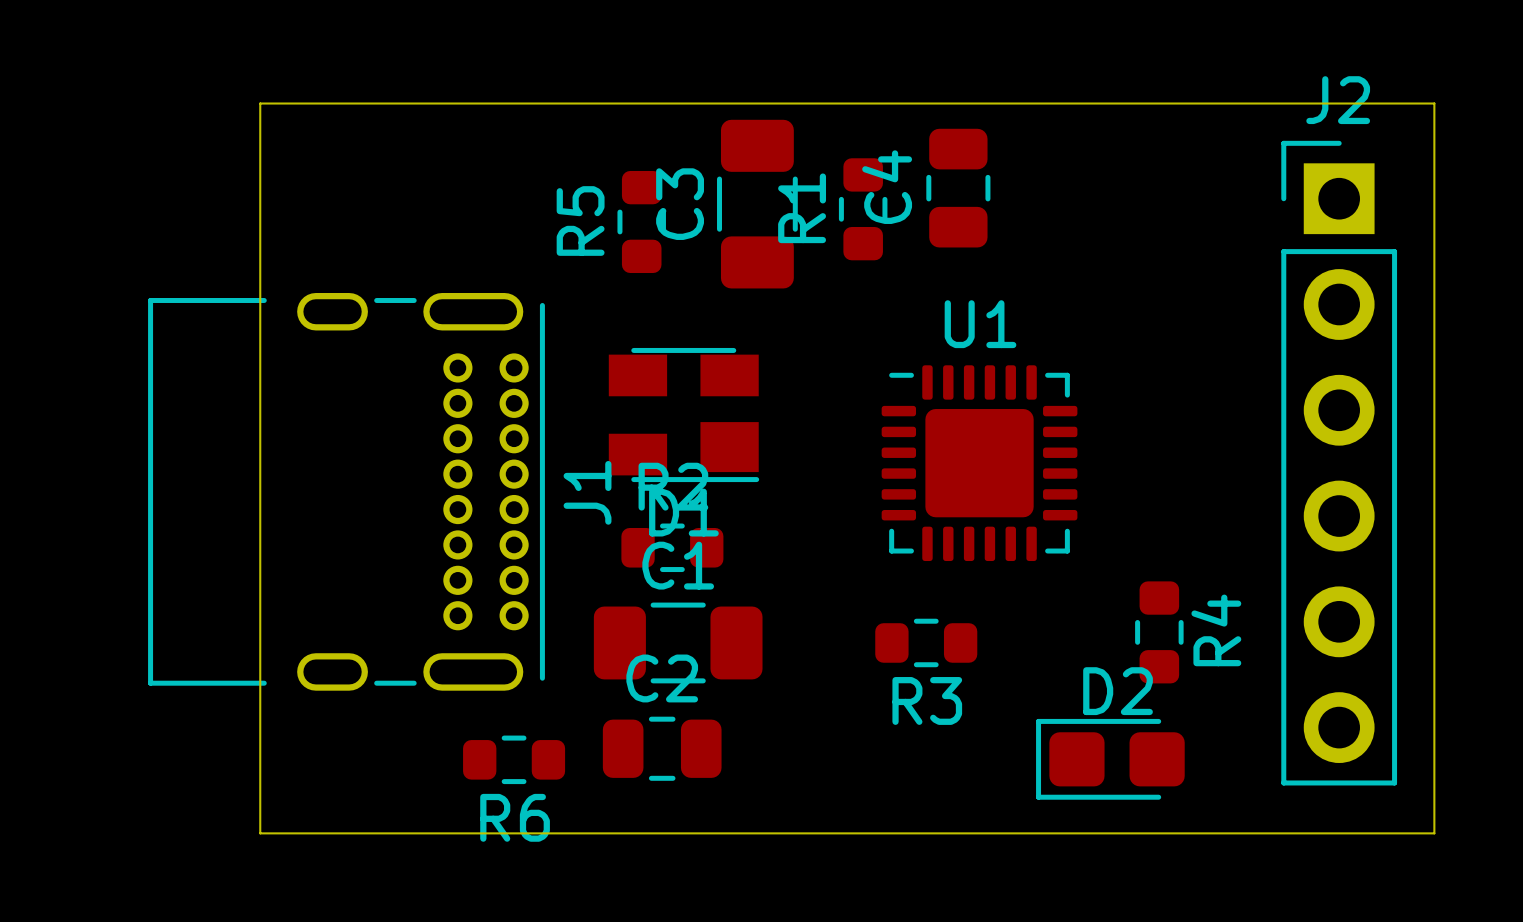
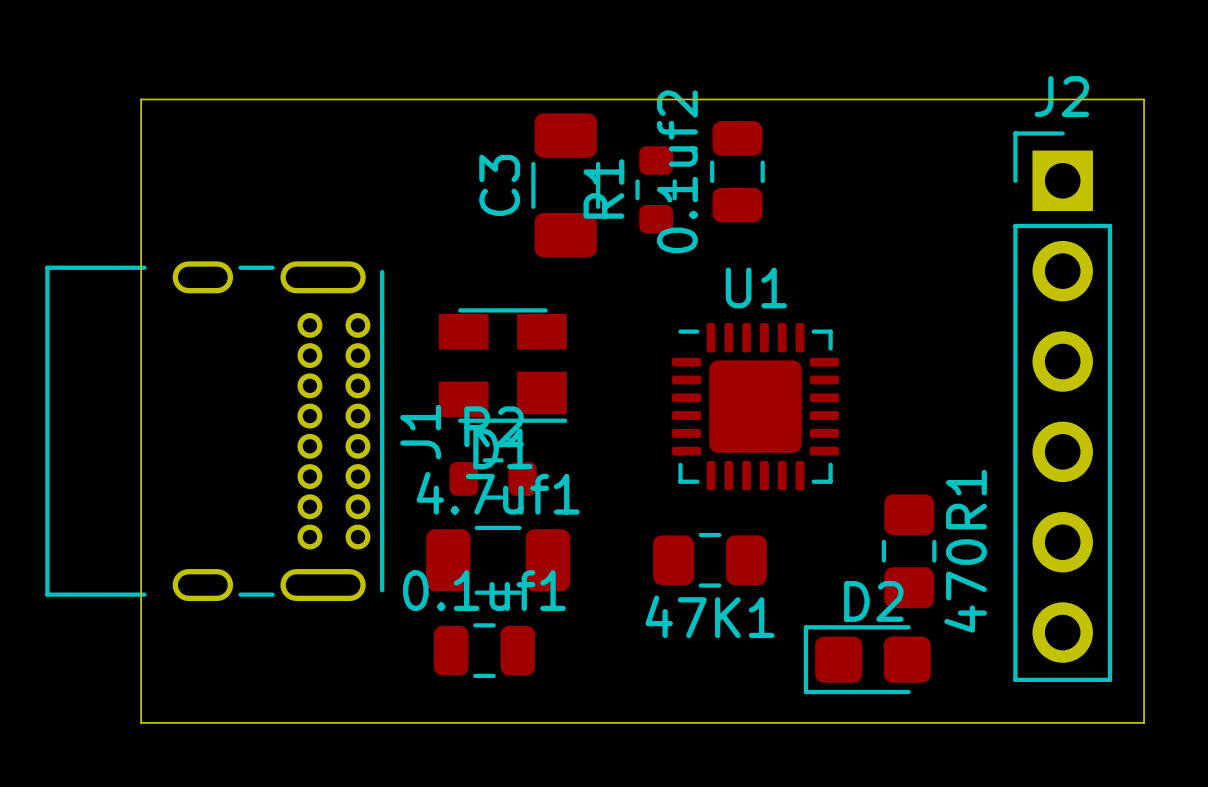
C4 name: C4 (887, 187) -> 0.1uf2 (677, 171)
R5: (641, 221) -> none
C1 name: C1 (678, 565) -> 4.7uf1 (498, 493)
R4: (1159, 632) -> none
470R1: none -> (909, 551)
R3: (926, 642) -> none
47K1: none -> (710, 560)
C2 name: C2 (662, 678) -> 0.1uf1 (484, 590)
R6: (514, 759) -> none

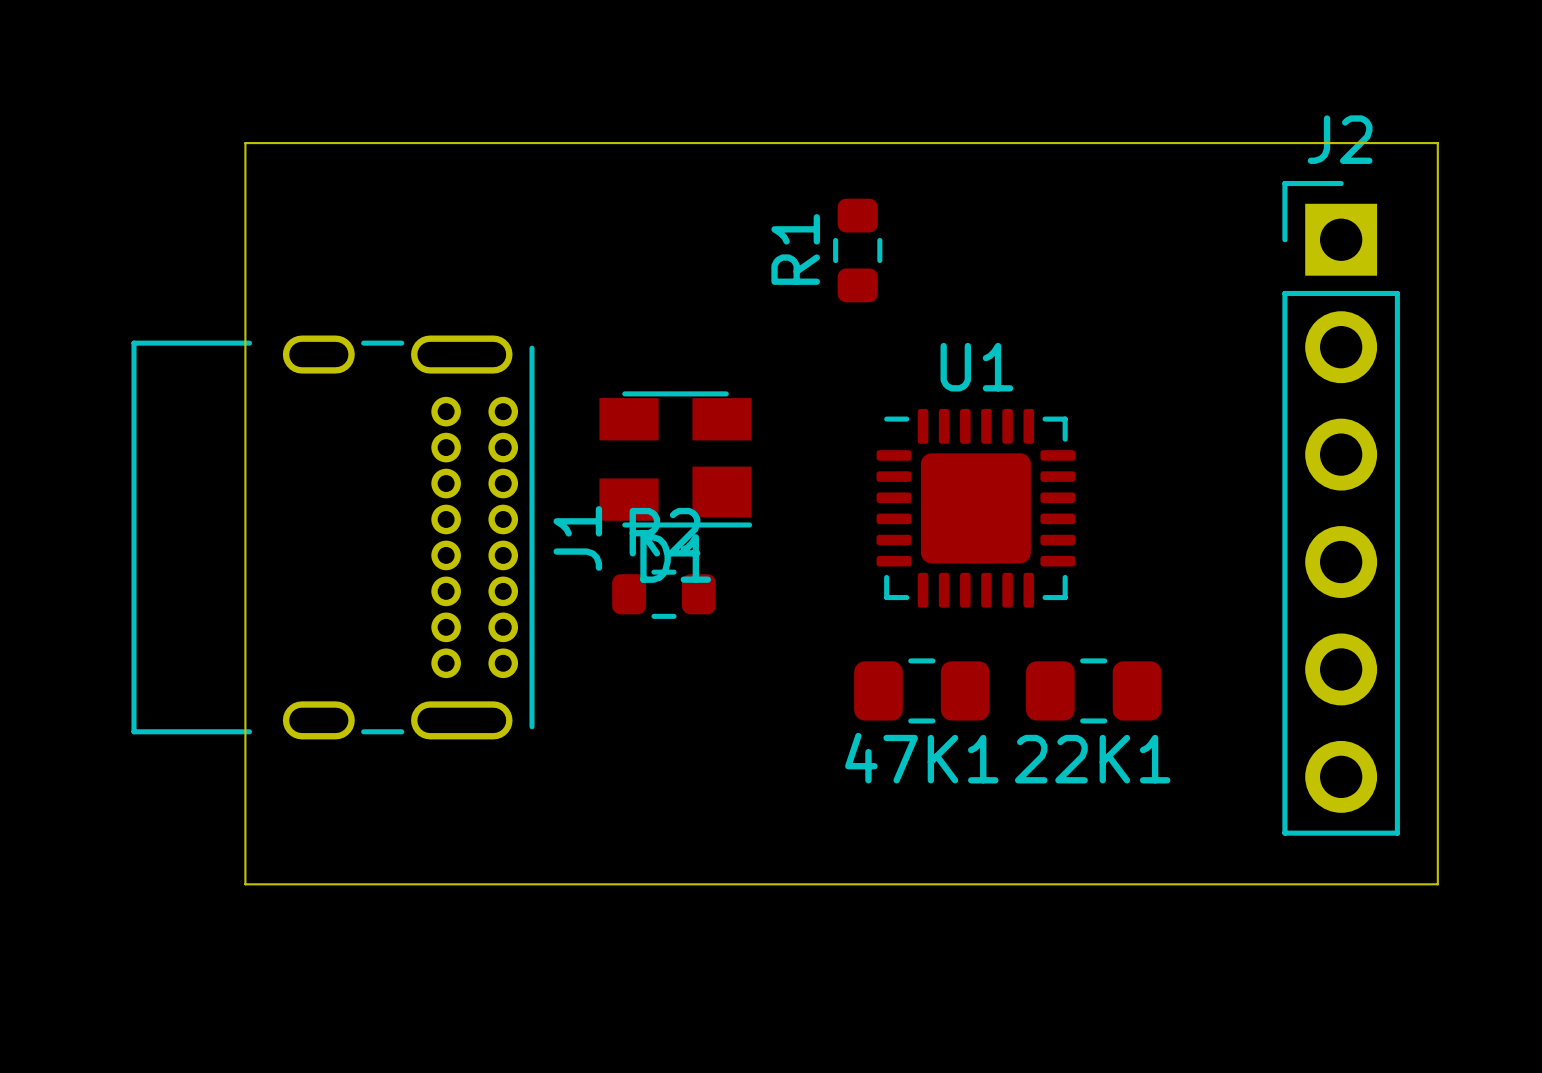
0.1uf2: (737, 171) -> none
C3: (565, 185) -> none
470R1: (909, 551) -> none
4.7uf1: (498, 560) -> none
22K1: none -> (1093, 690)
0.1uf1: (484, 650) -> none
D2: (867, 659) -> none

